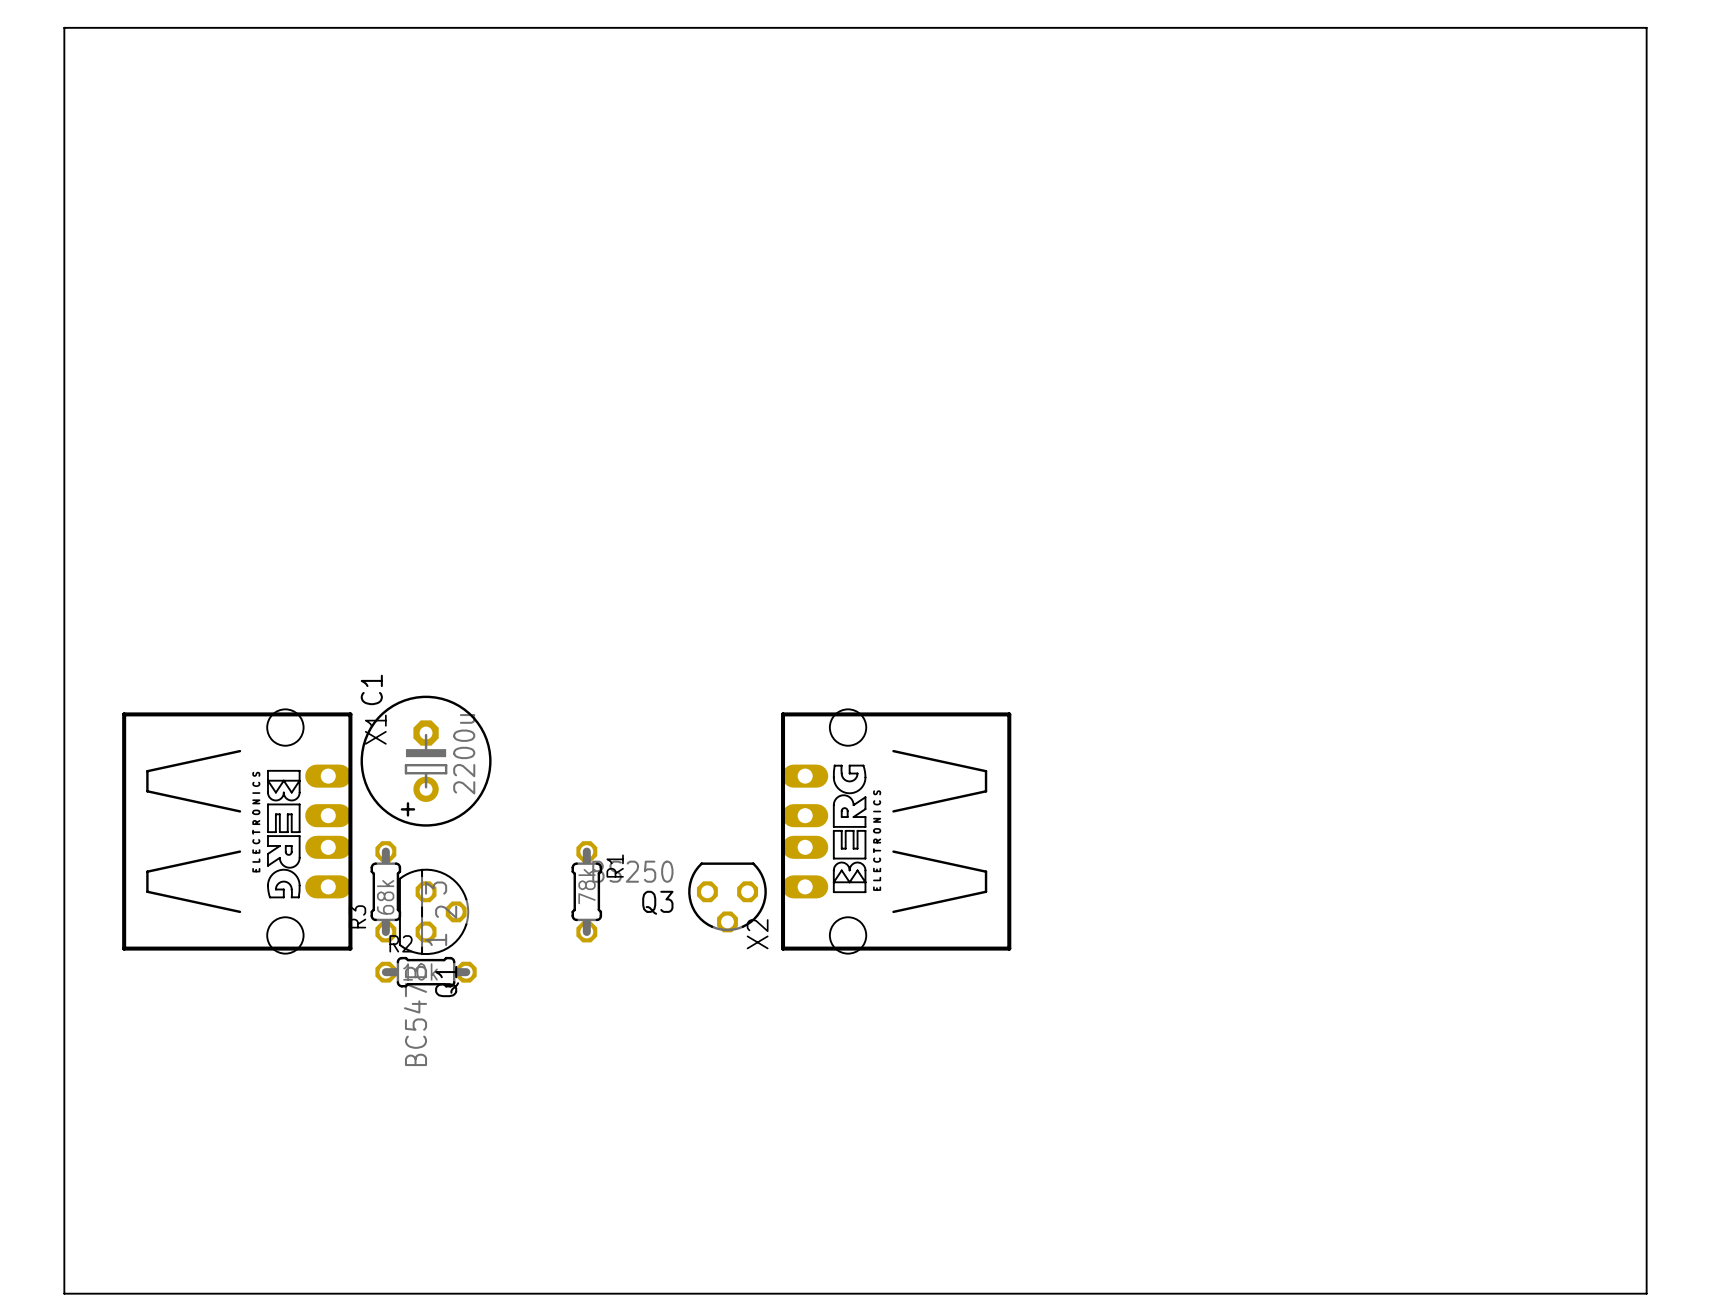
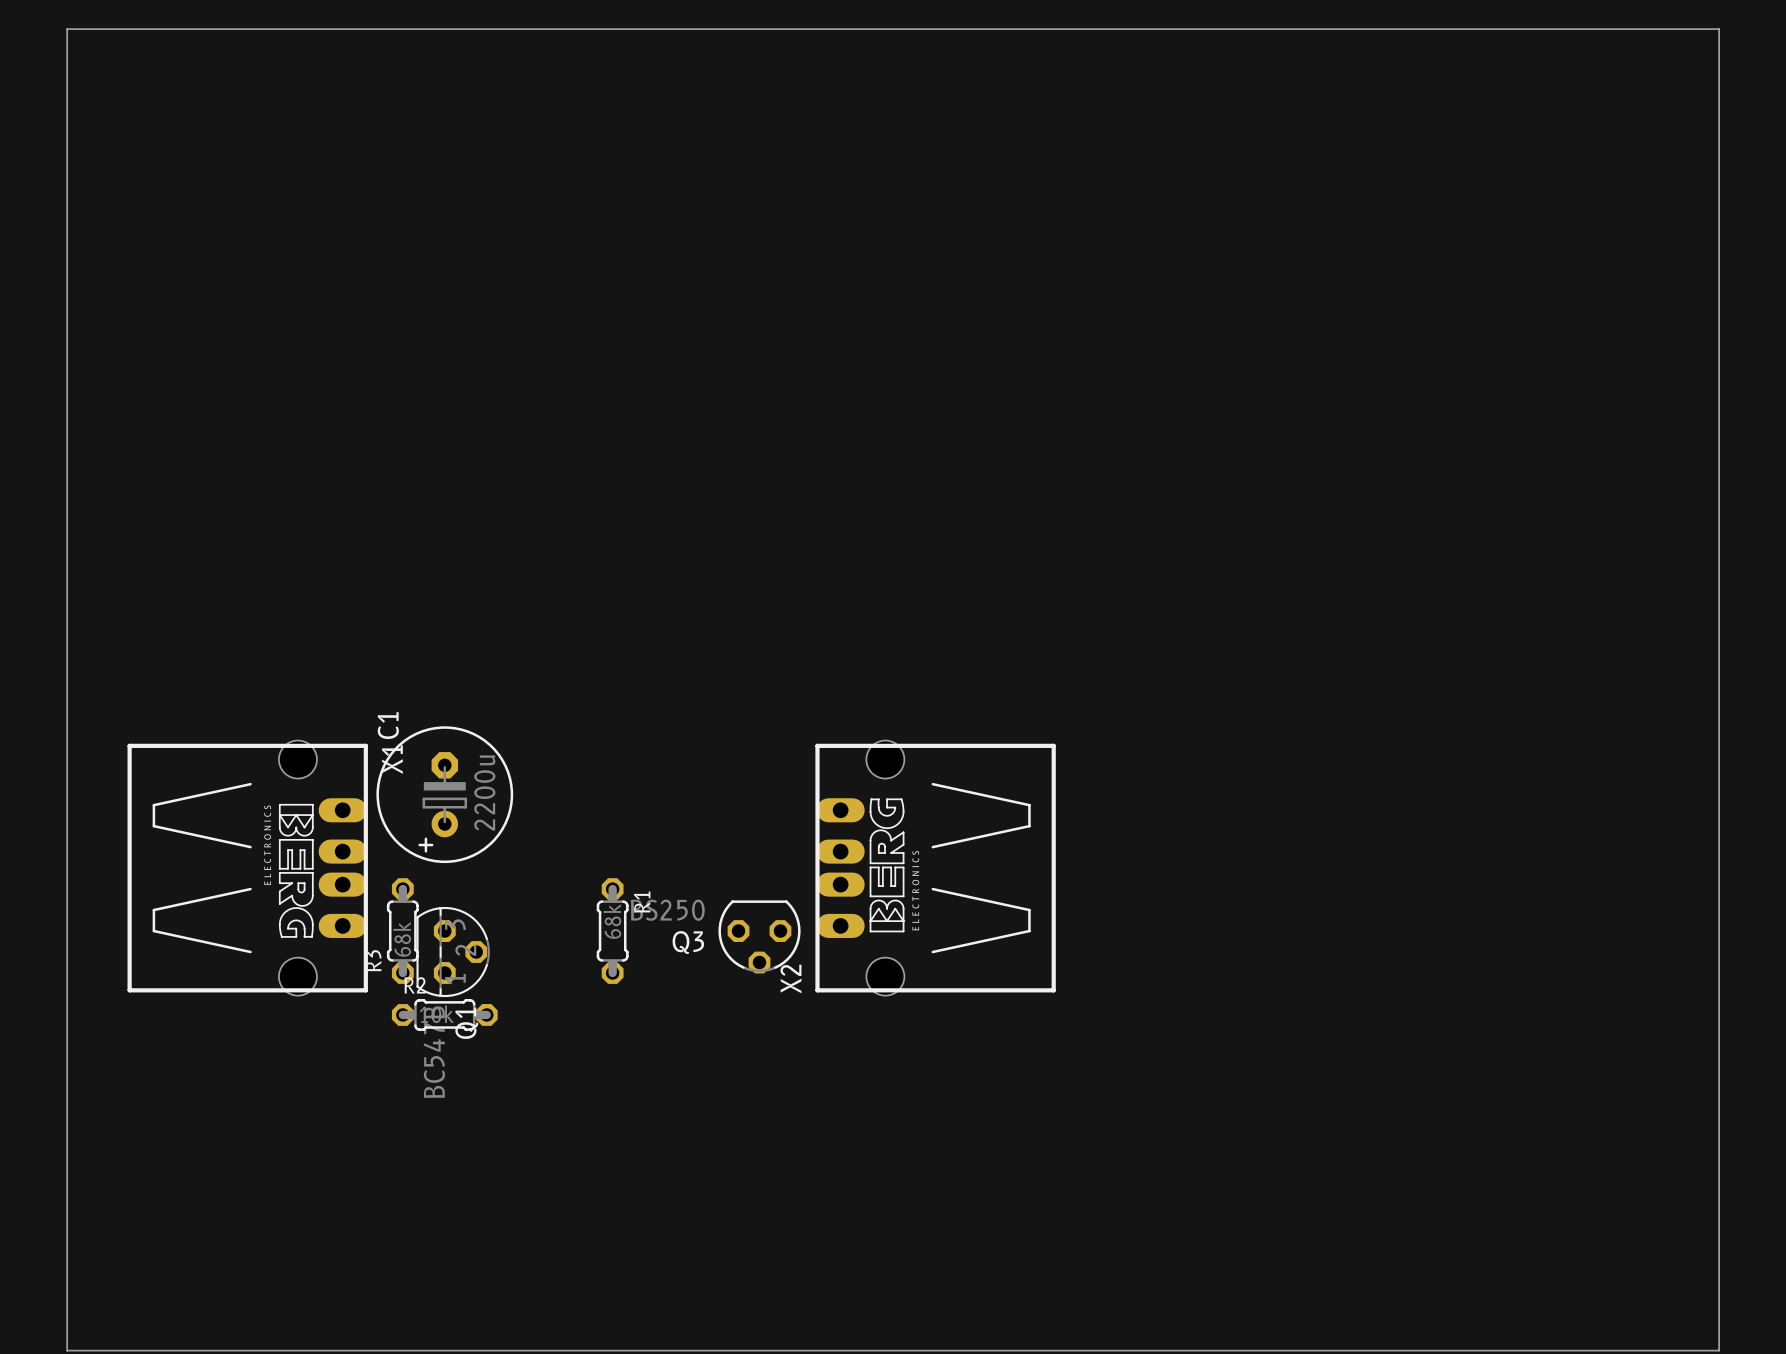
R1 value: 78k (587, 886) -> 68k (612, 921)

